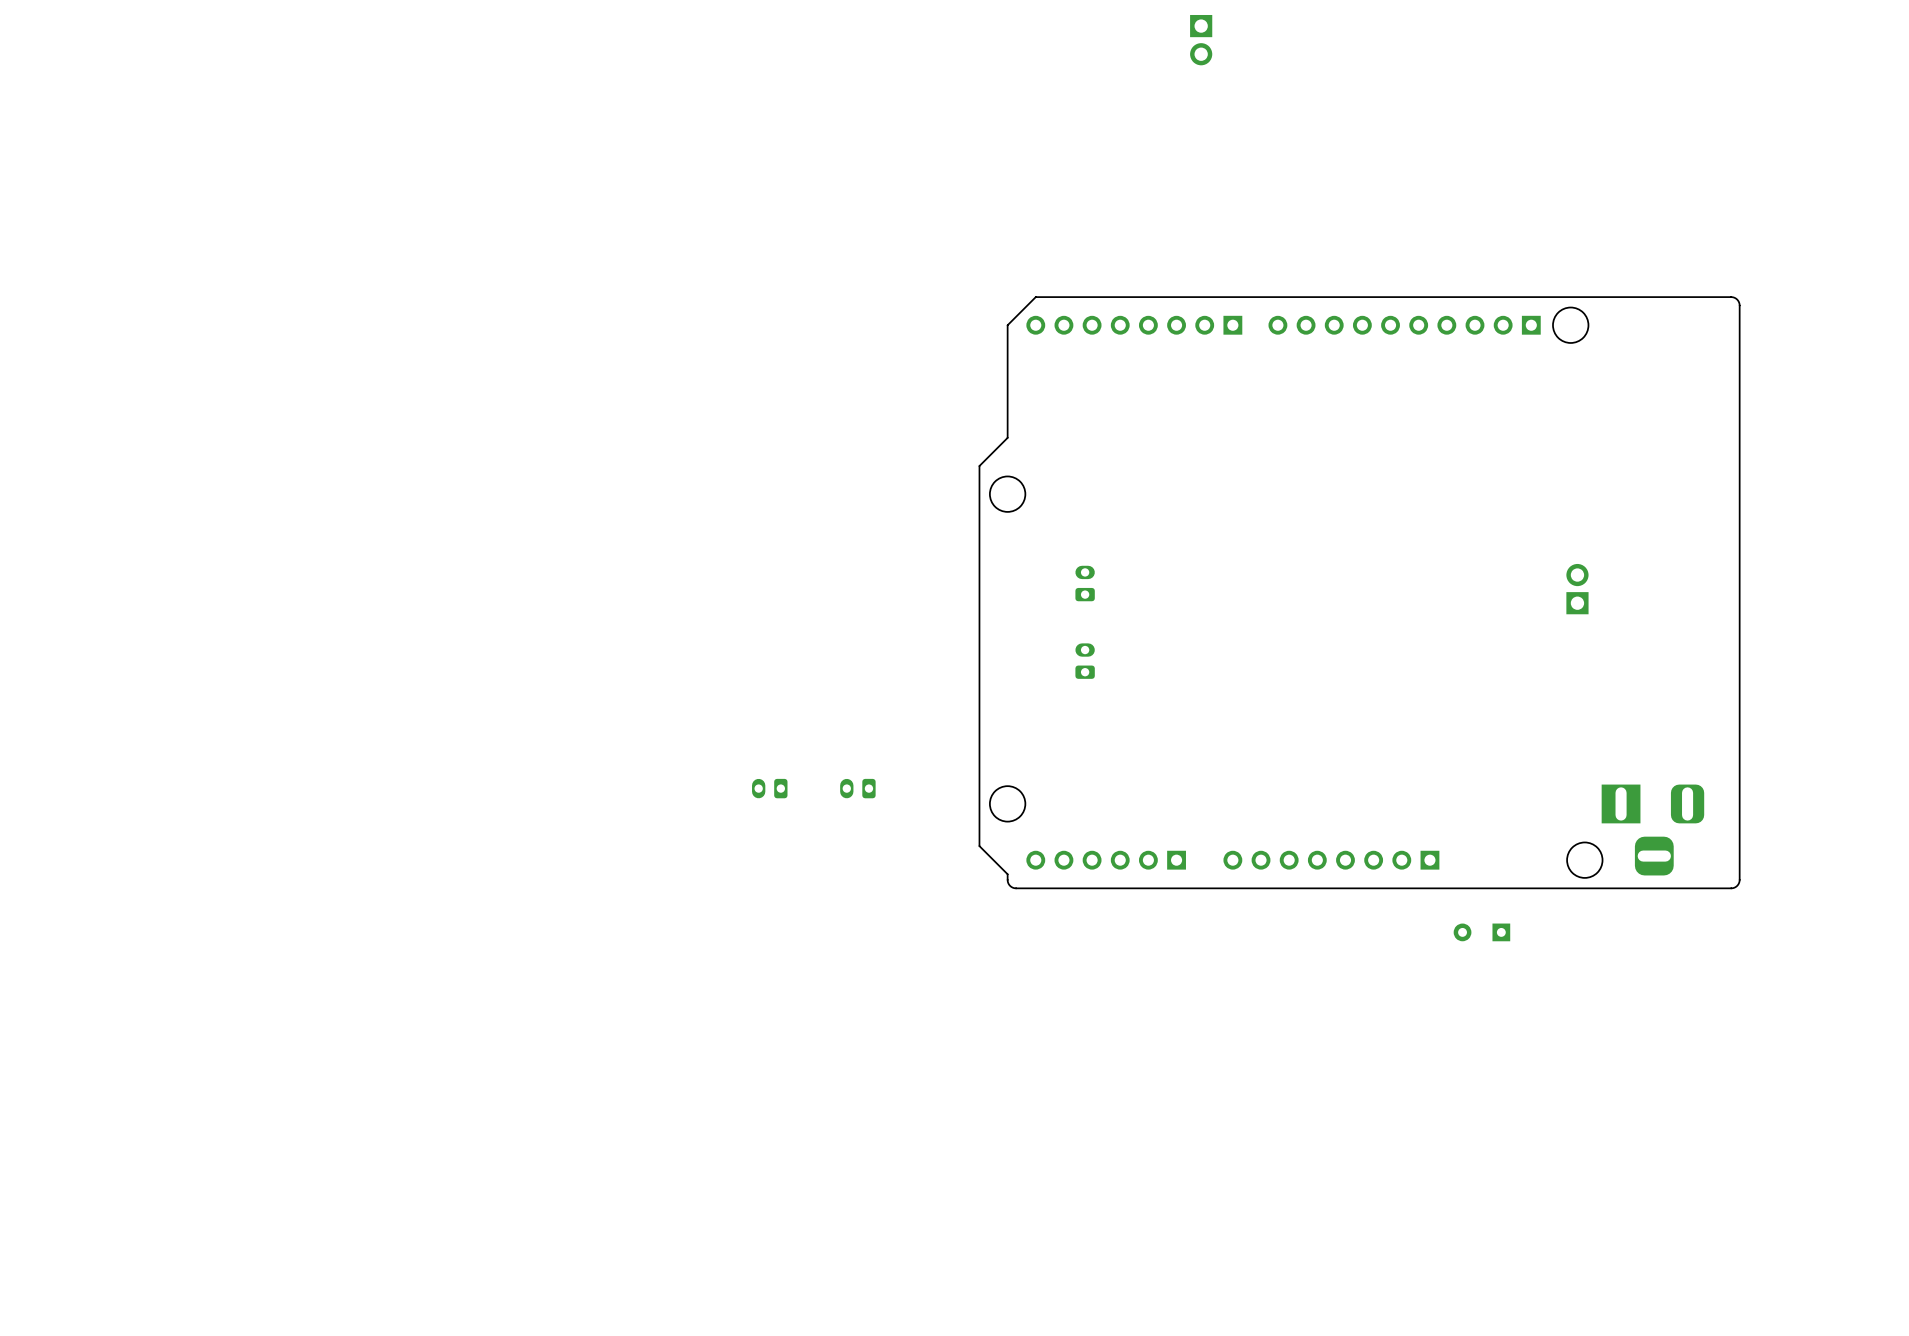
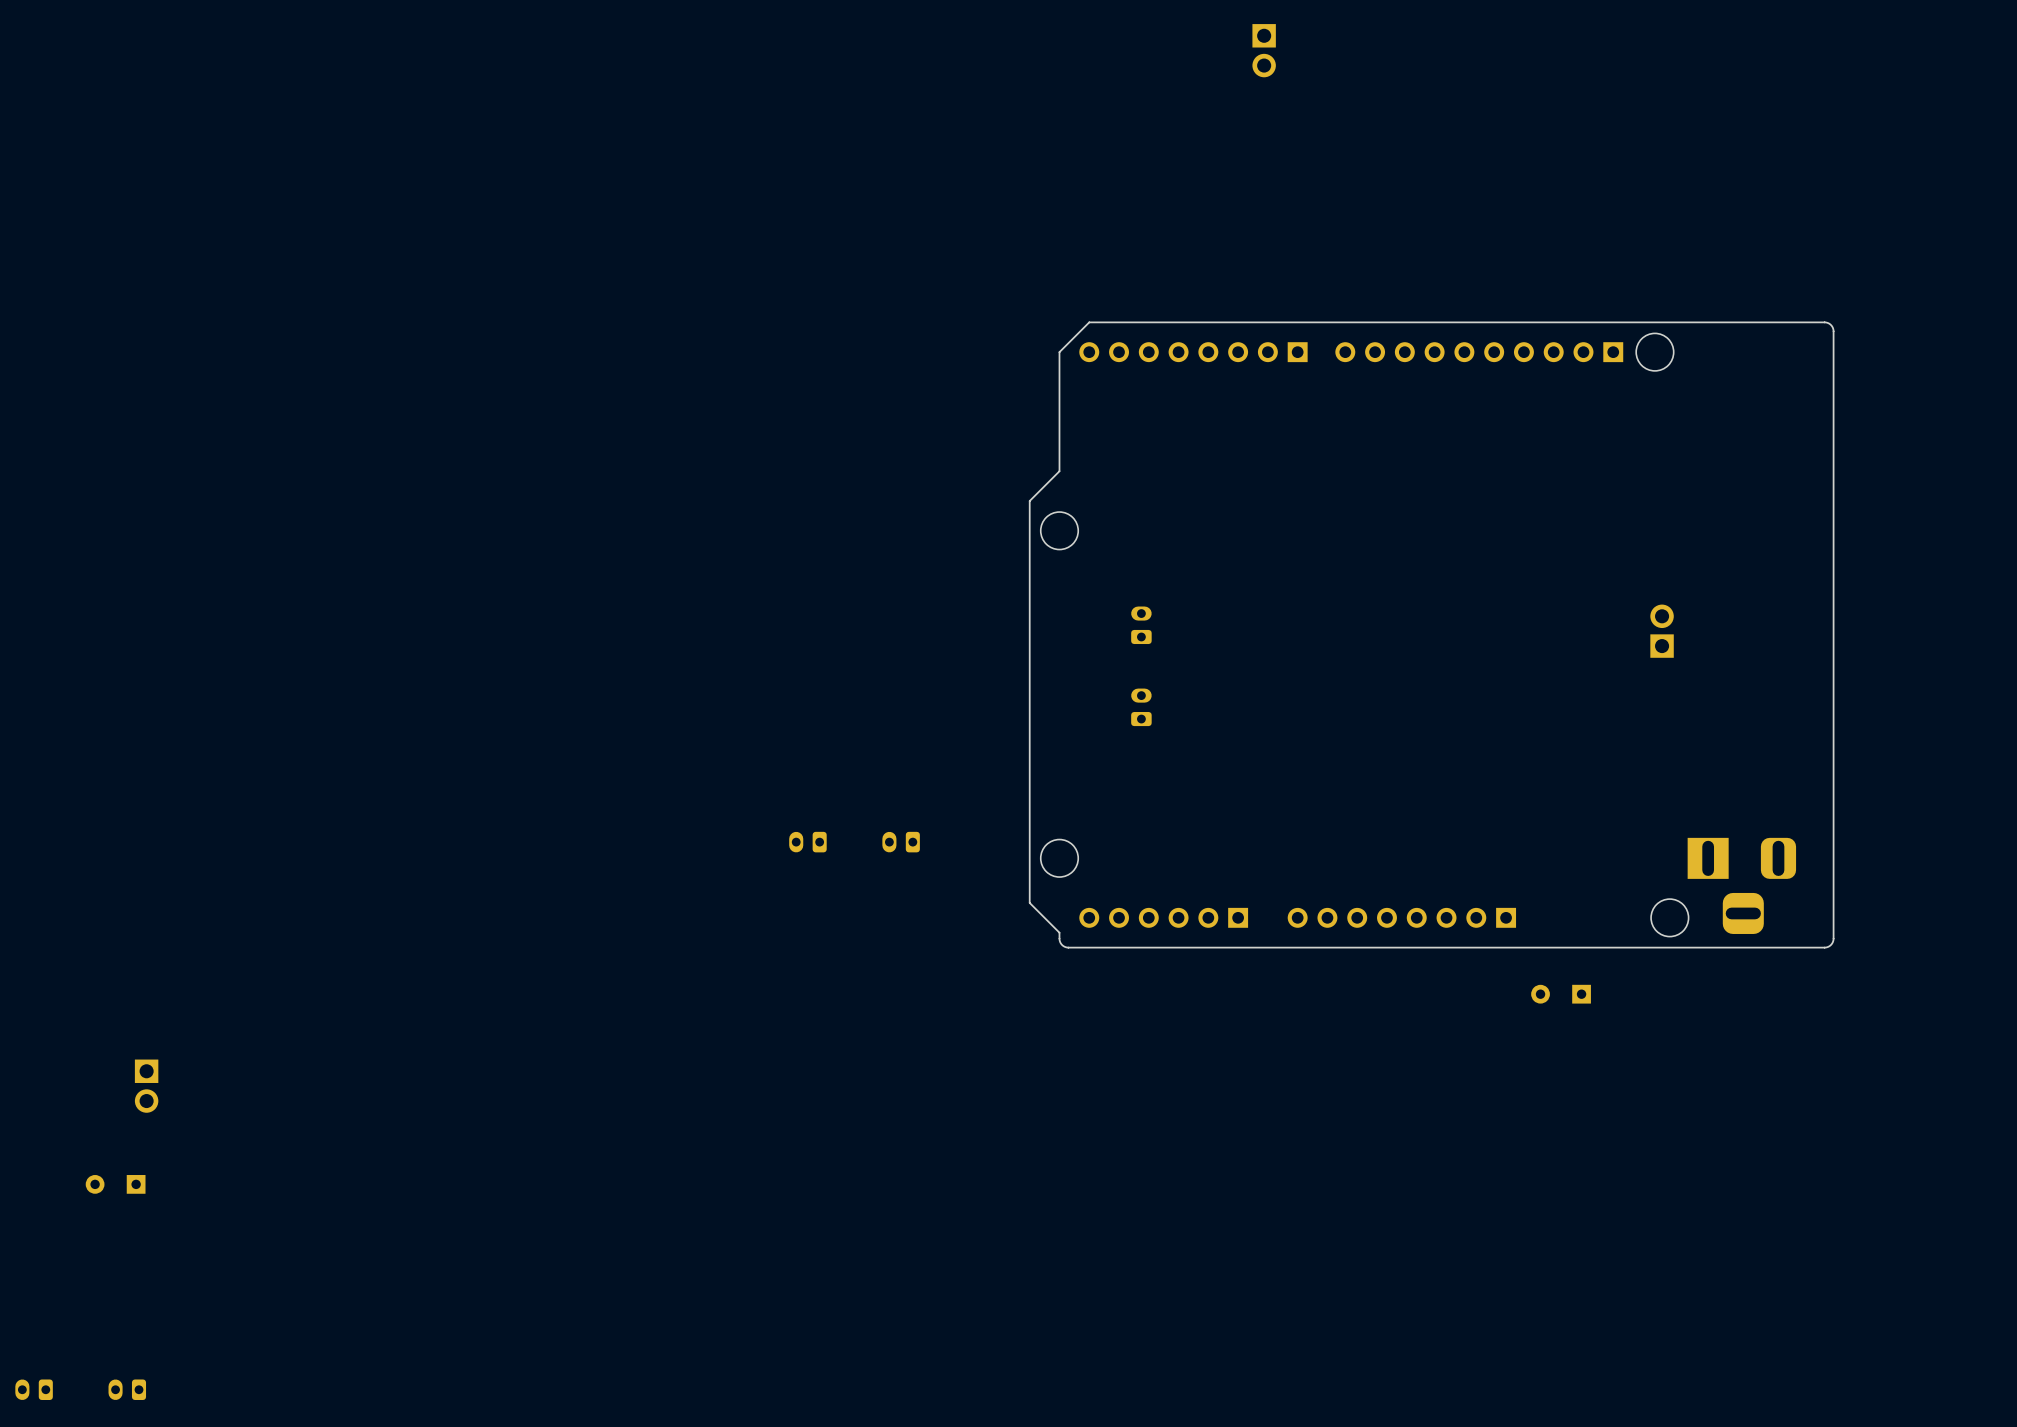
part: none -> (146, 1086)
part: none -> (115, 1184)
part: none -> (34, 1389)
part: none -> (127, 1389)

